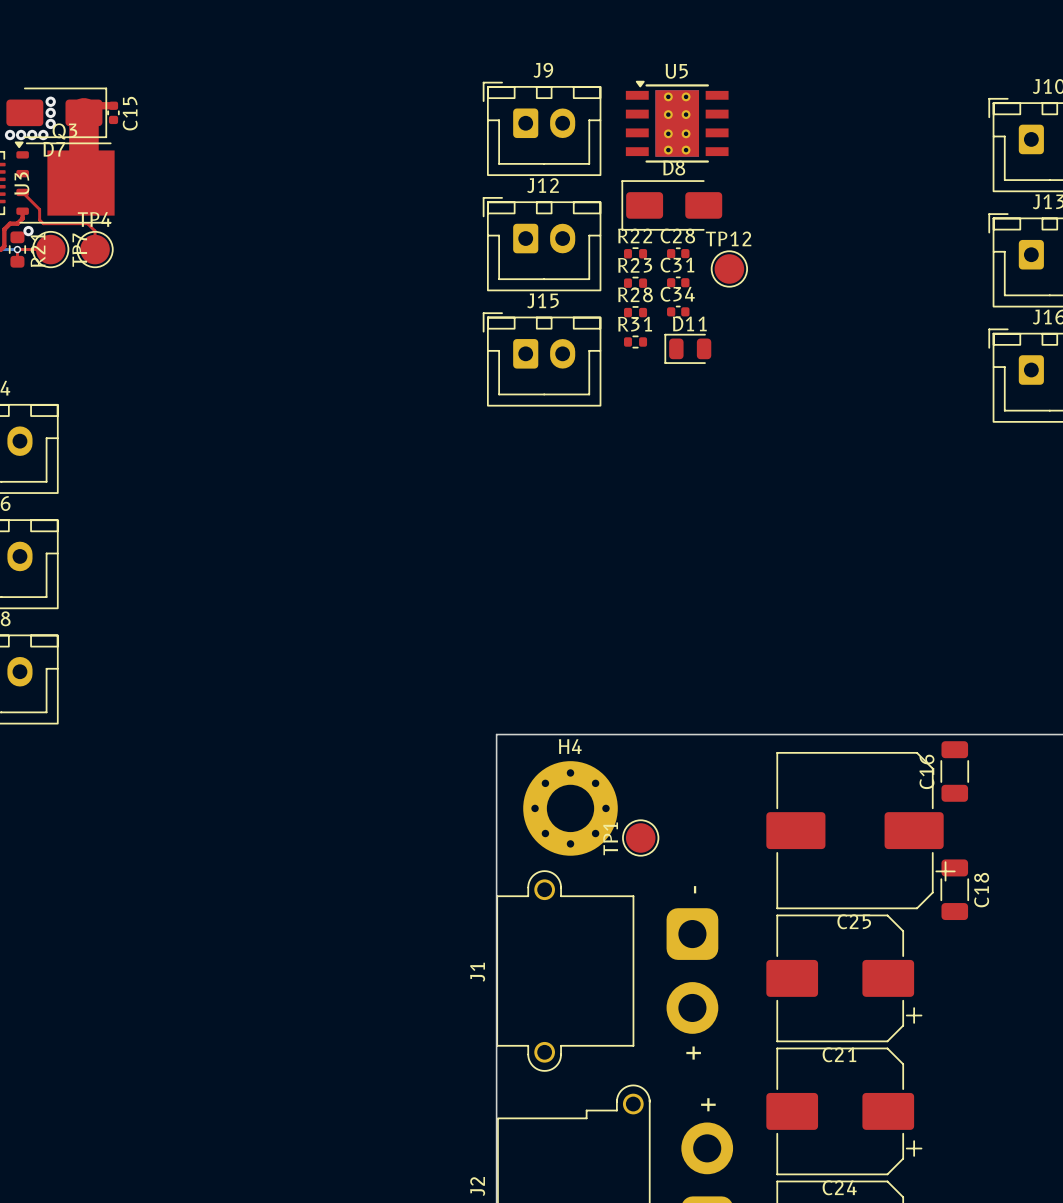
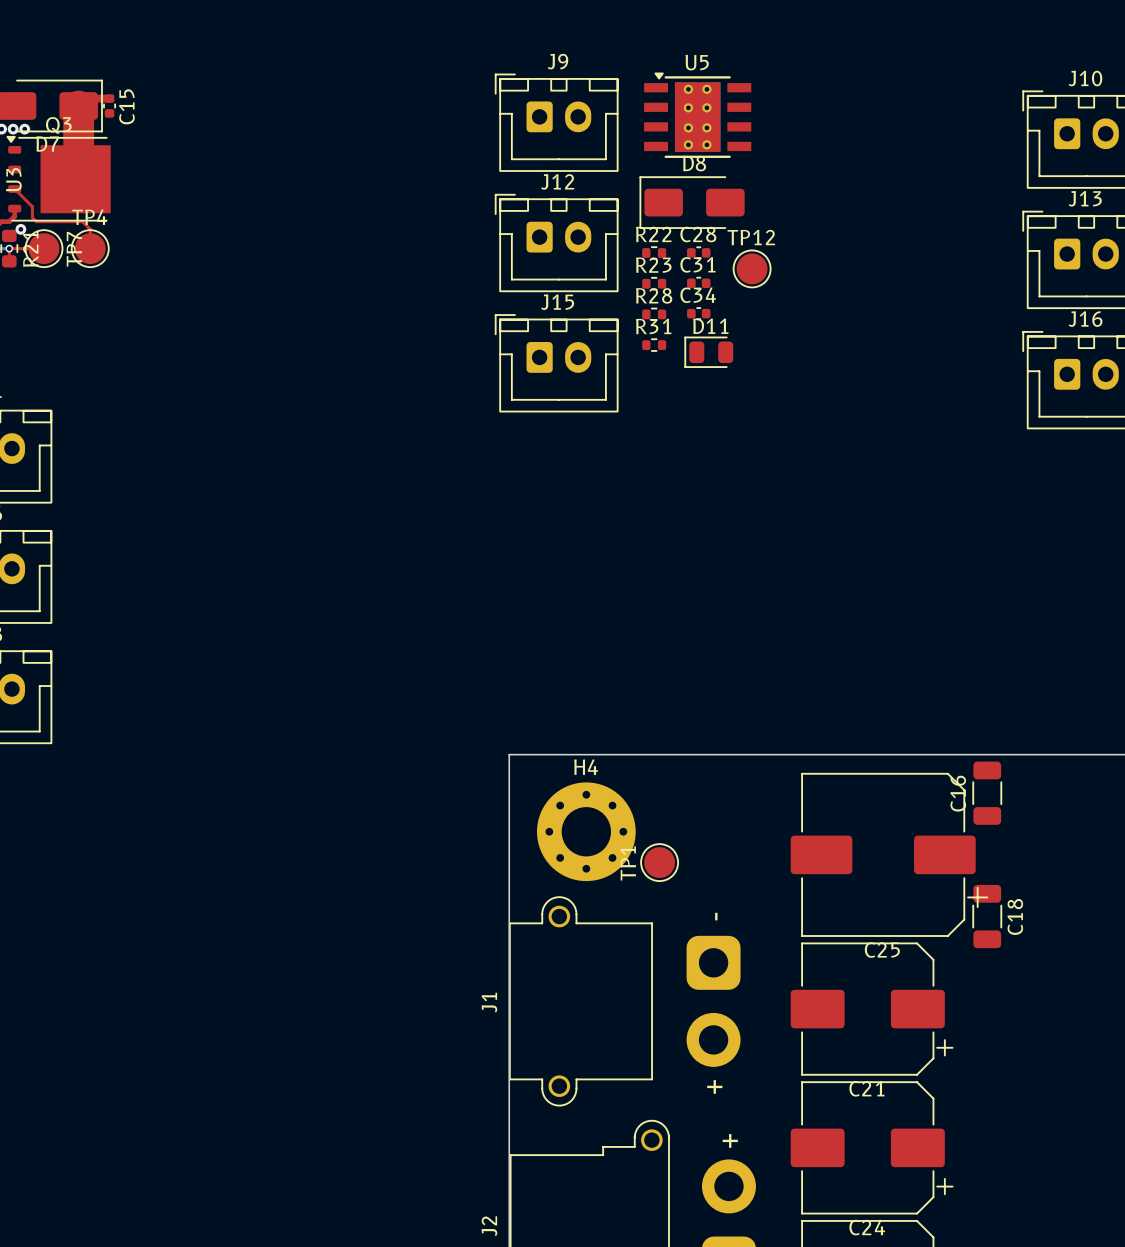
via: (50, 101) -> none
via: (50, 112) -> none
via: (50, 123) -> none
via: (43, 135) -> none

